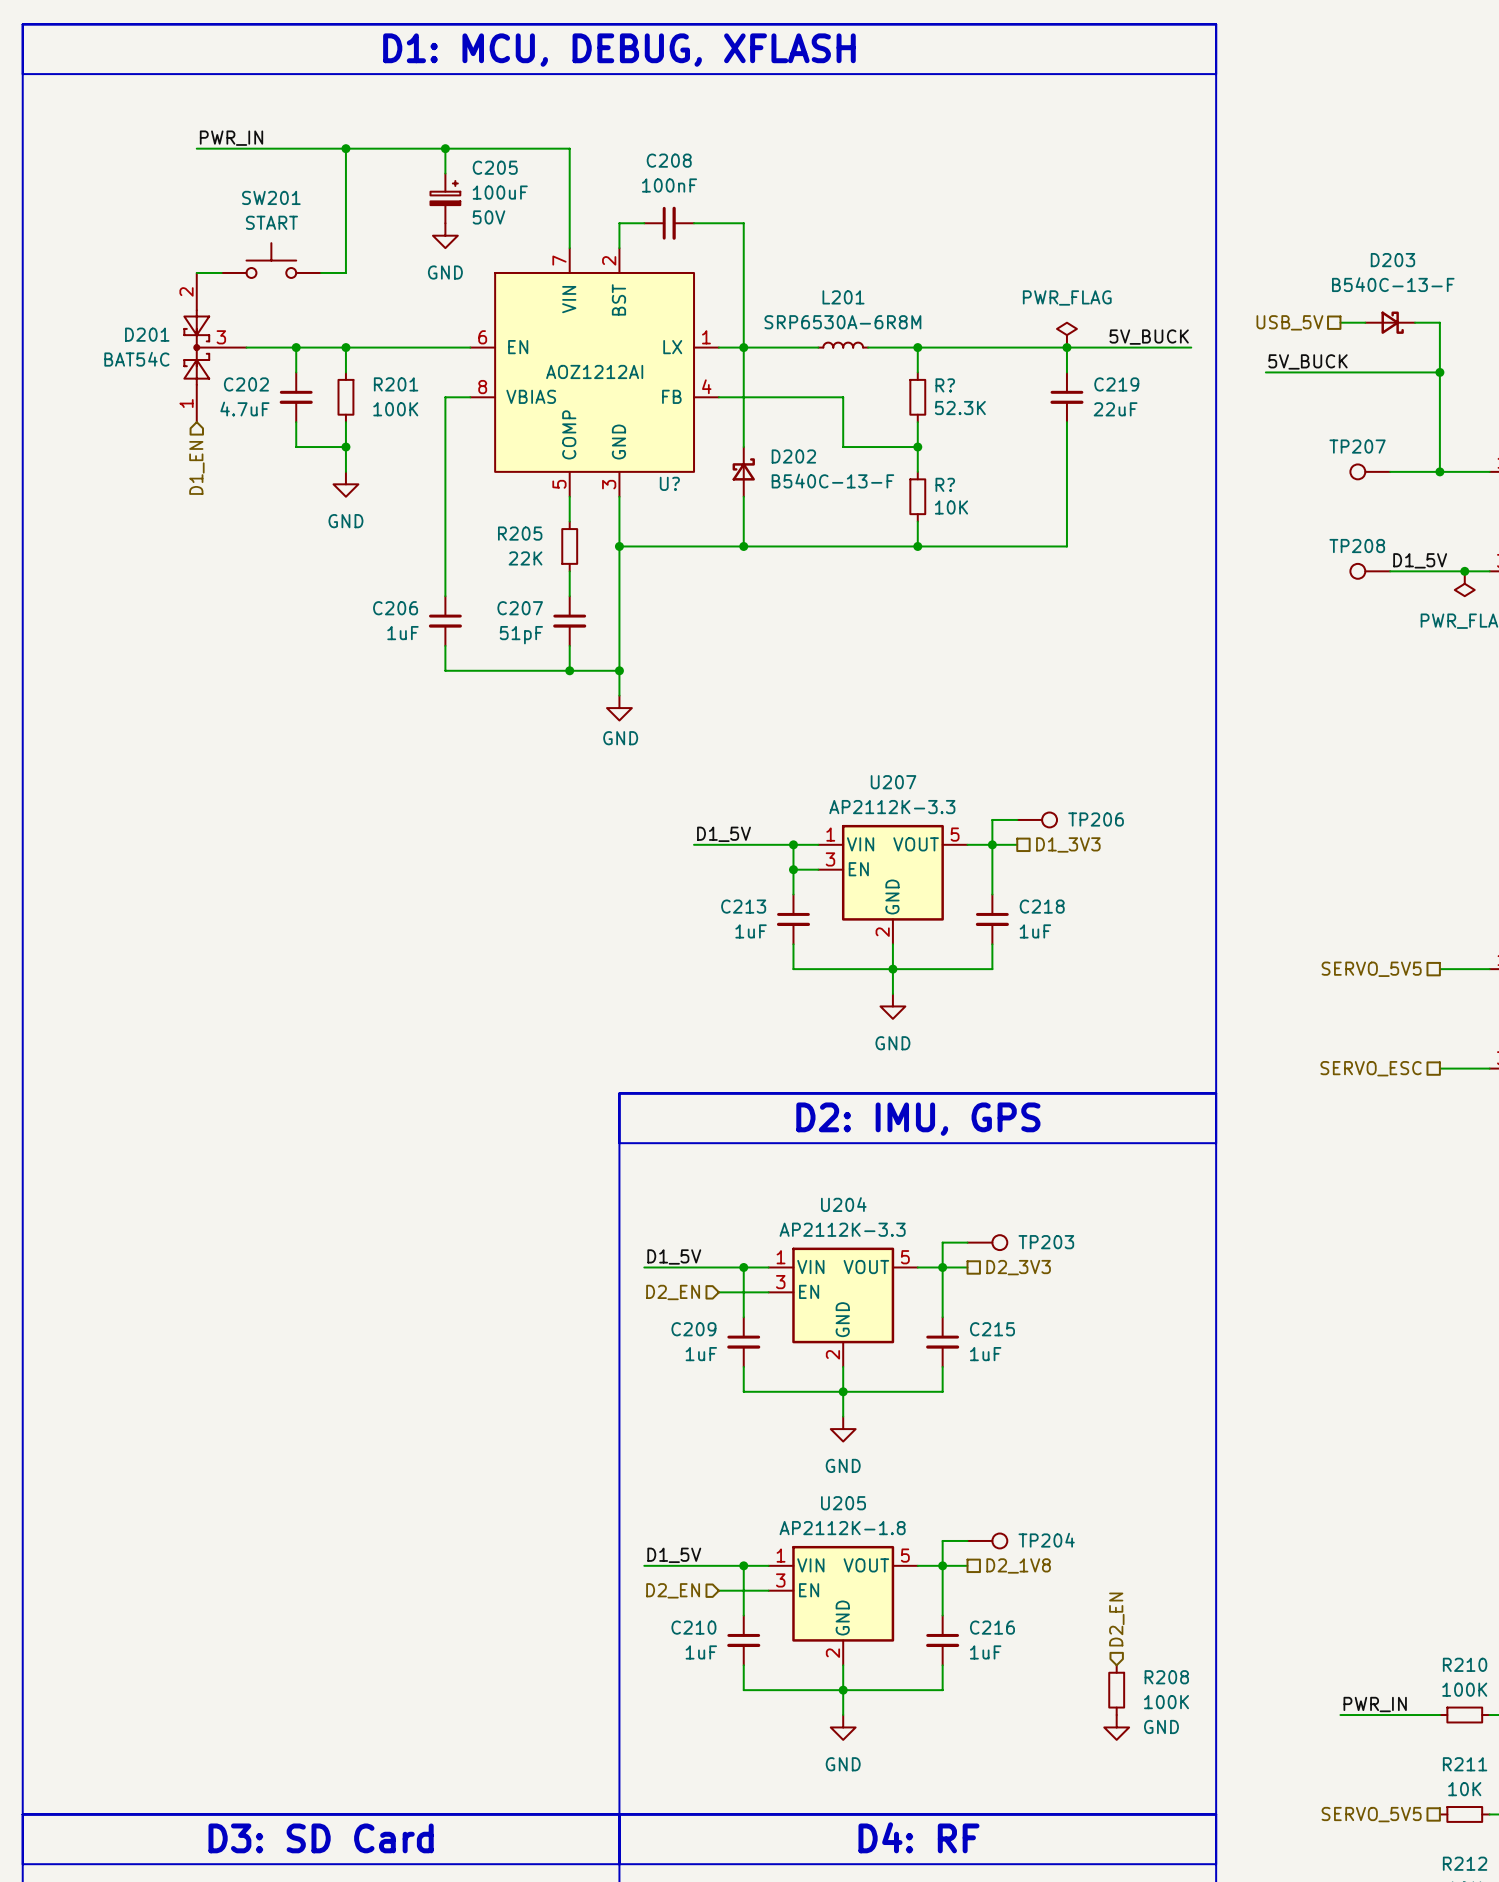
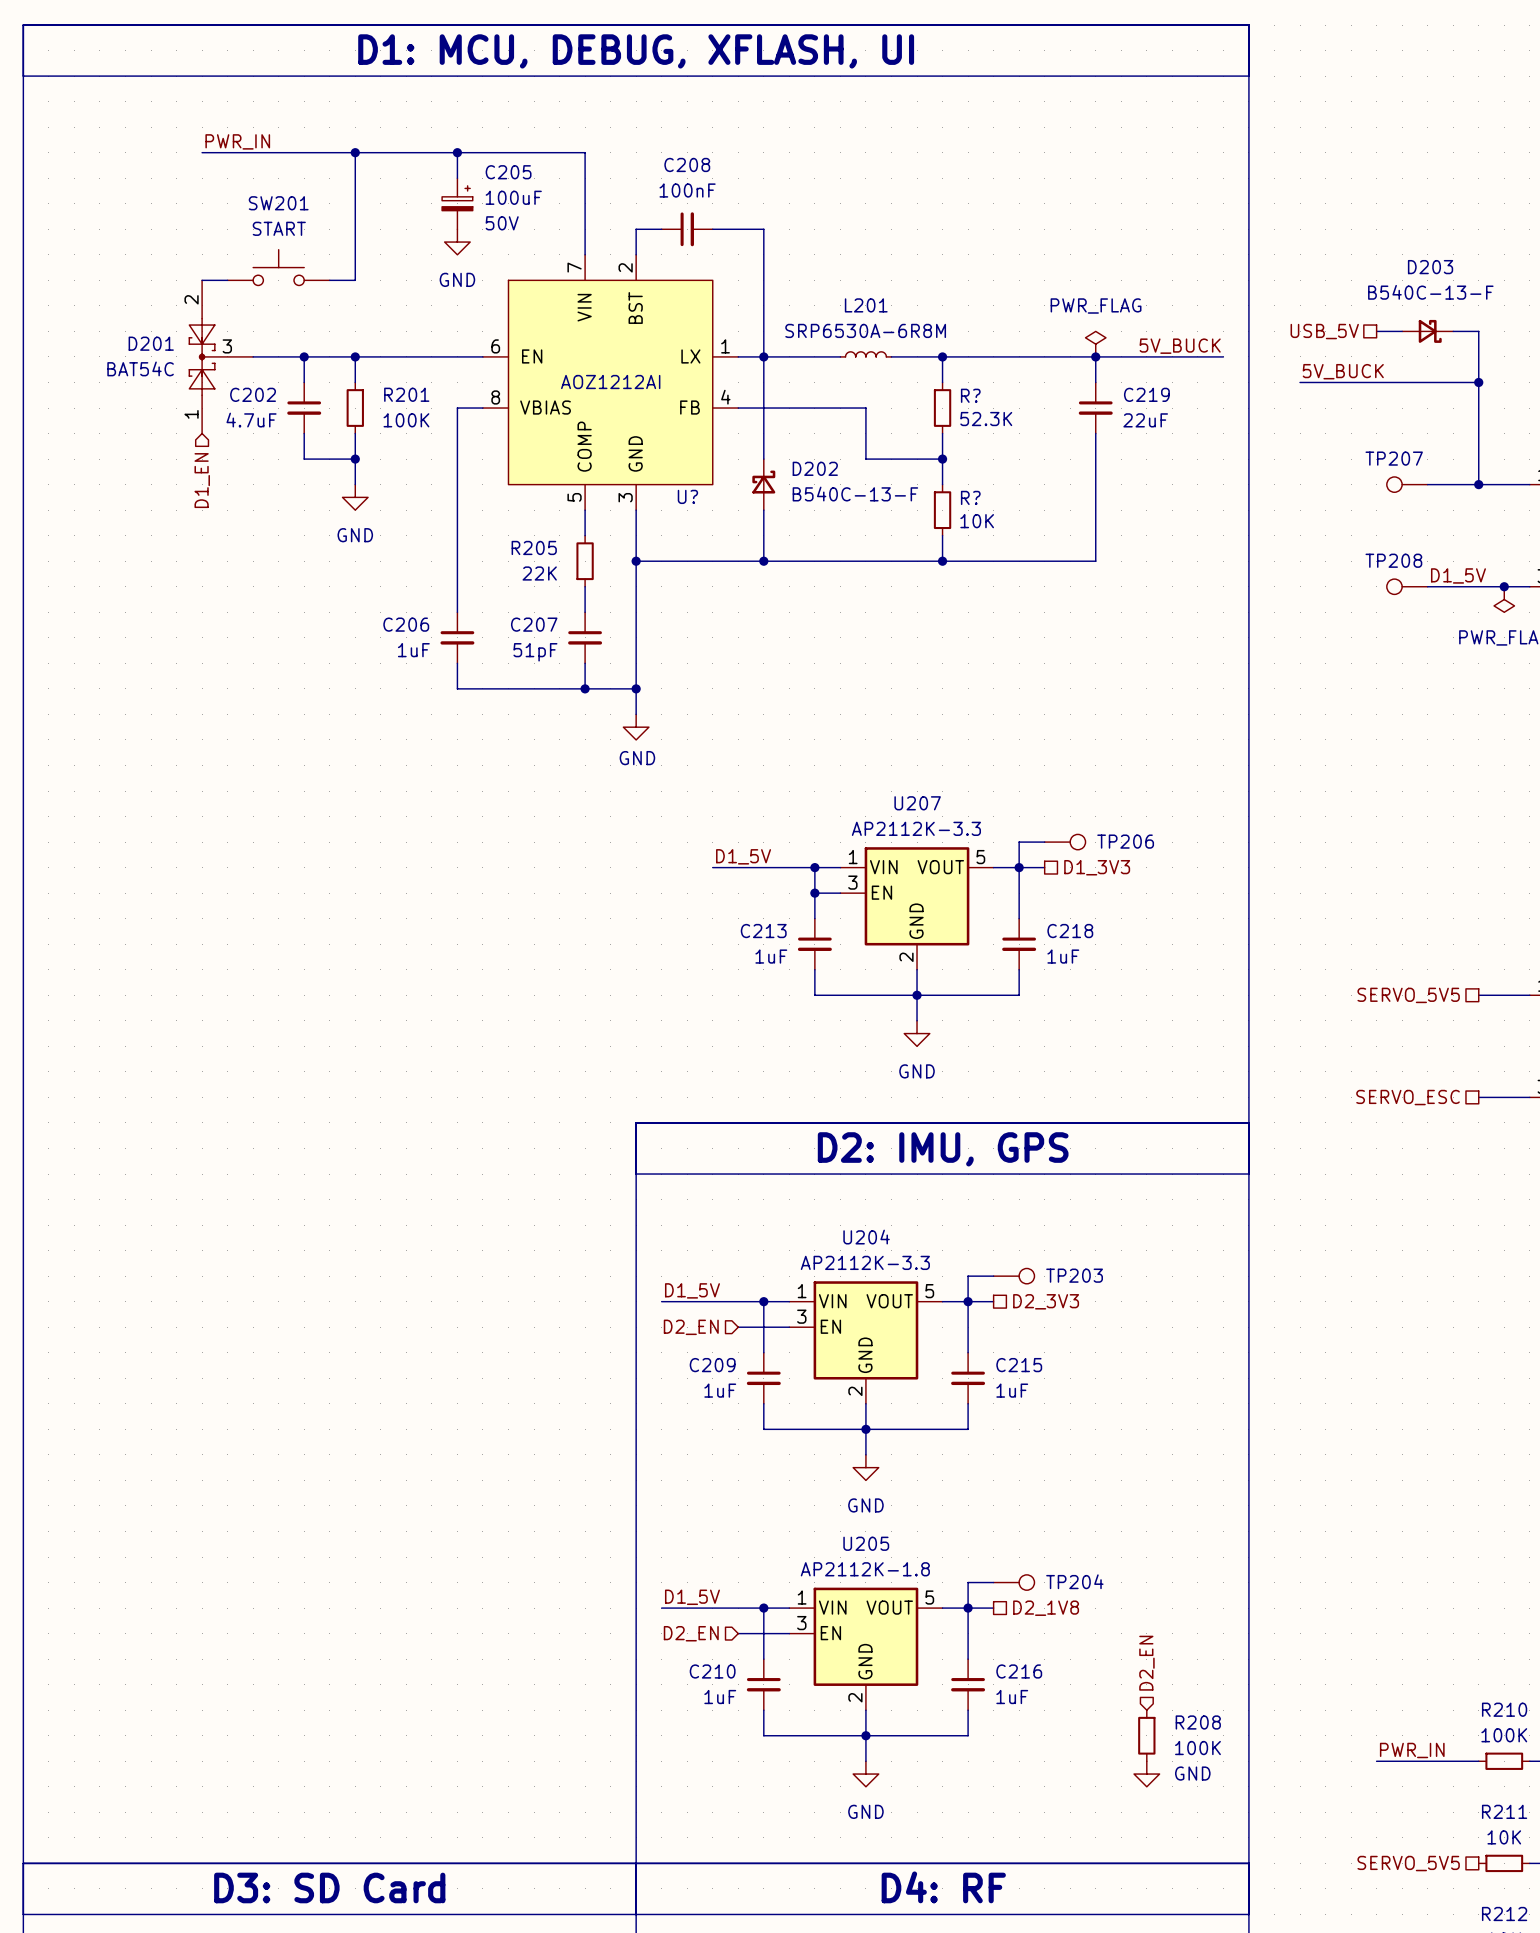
text: D1: MCU, DEBUG, XFLASH (619, 50) -> D1: MCU, DEBUG, XFLASH, UI (636, 51)

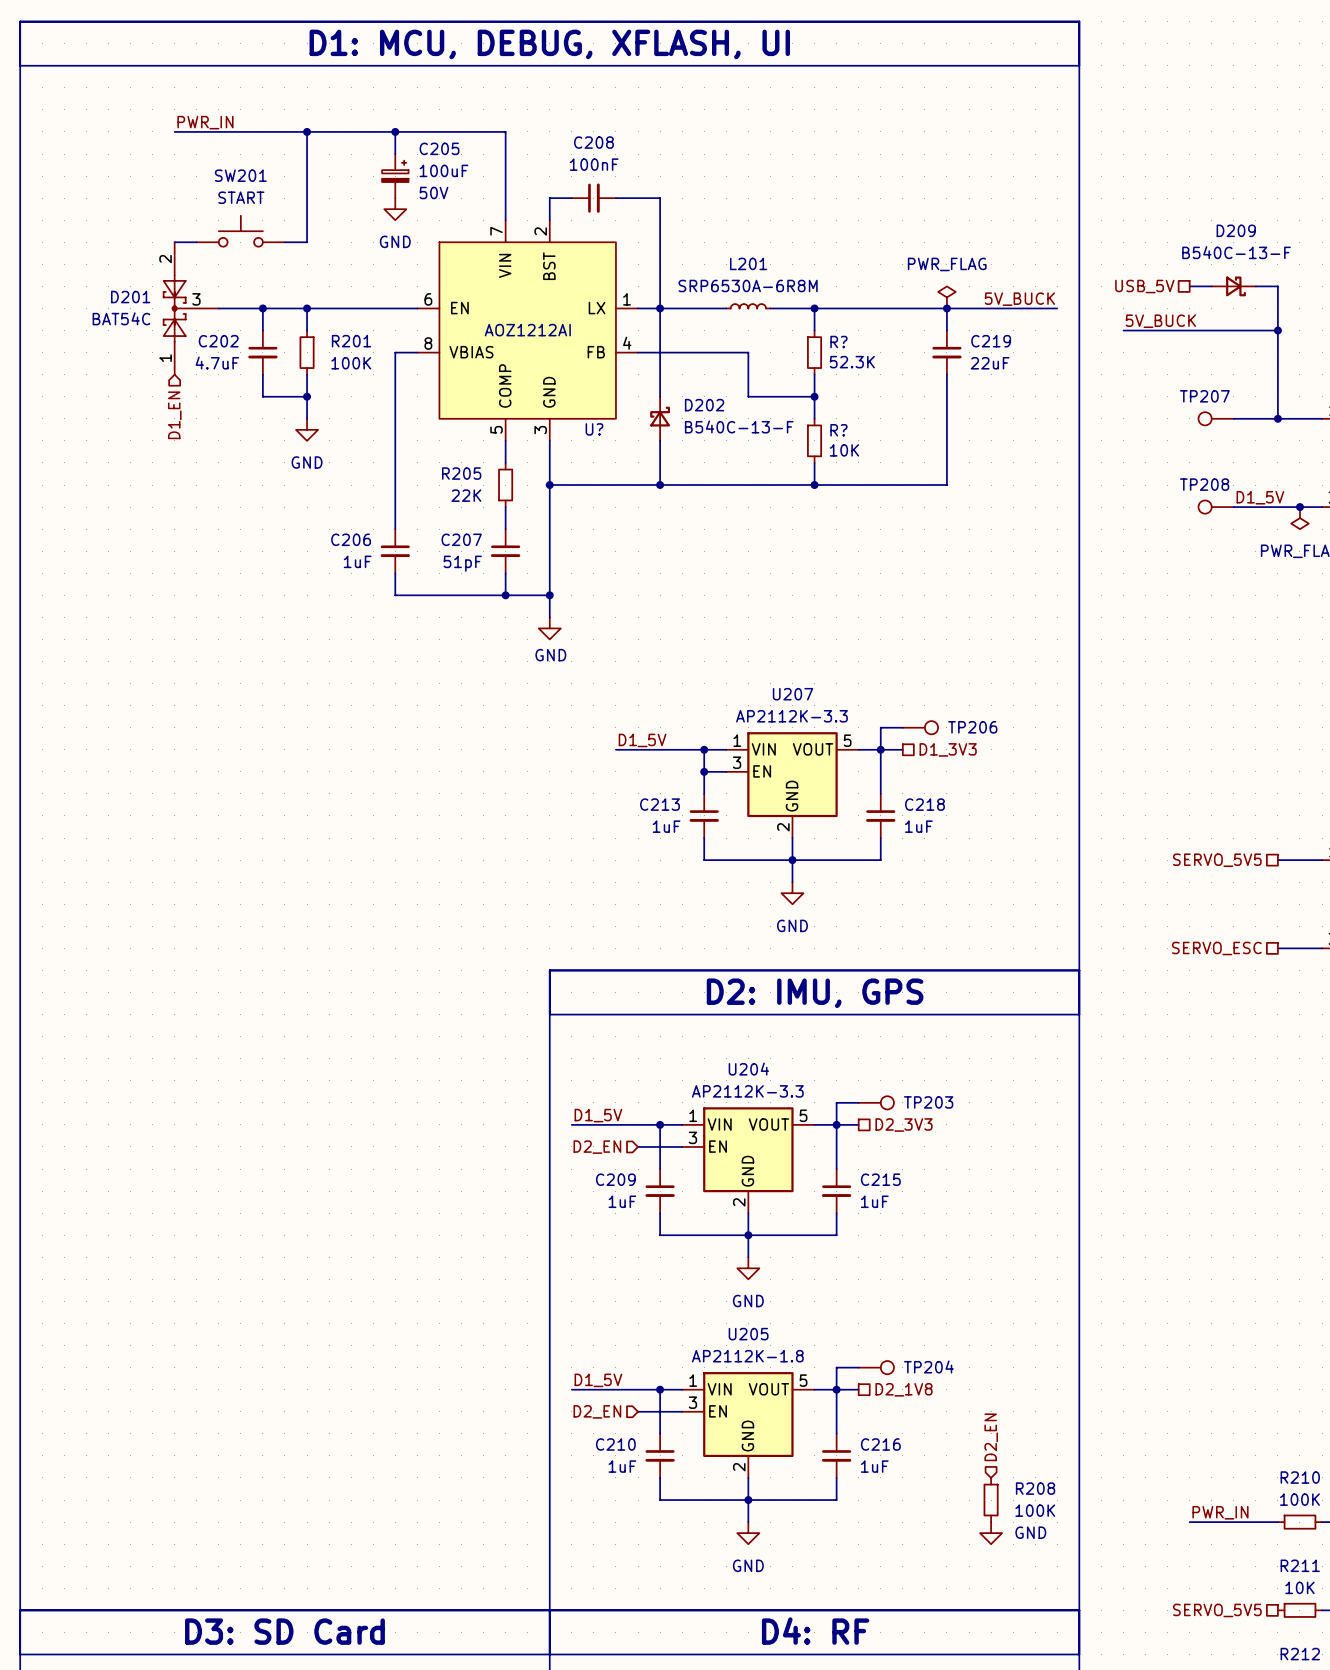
D203 name: D203 (1430, 267) -> D209 (1236, 230)

